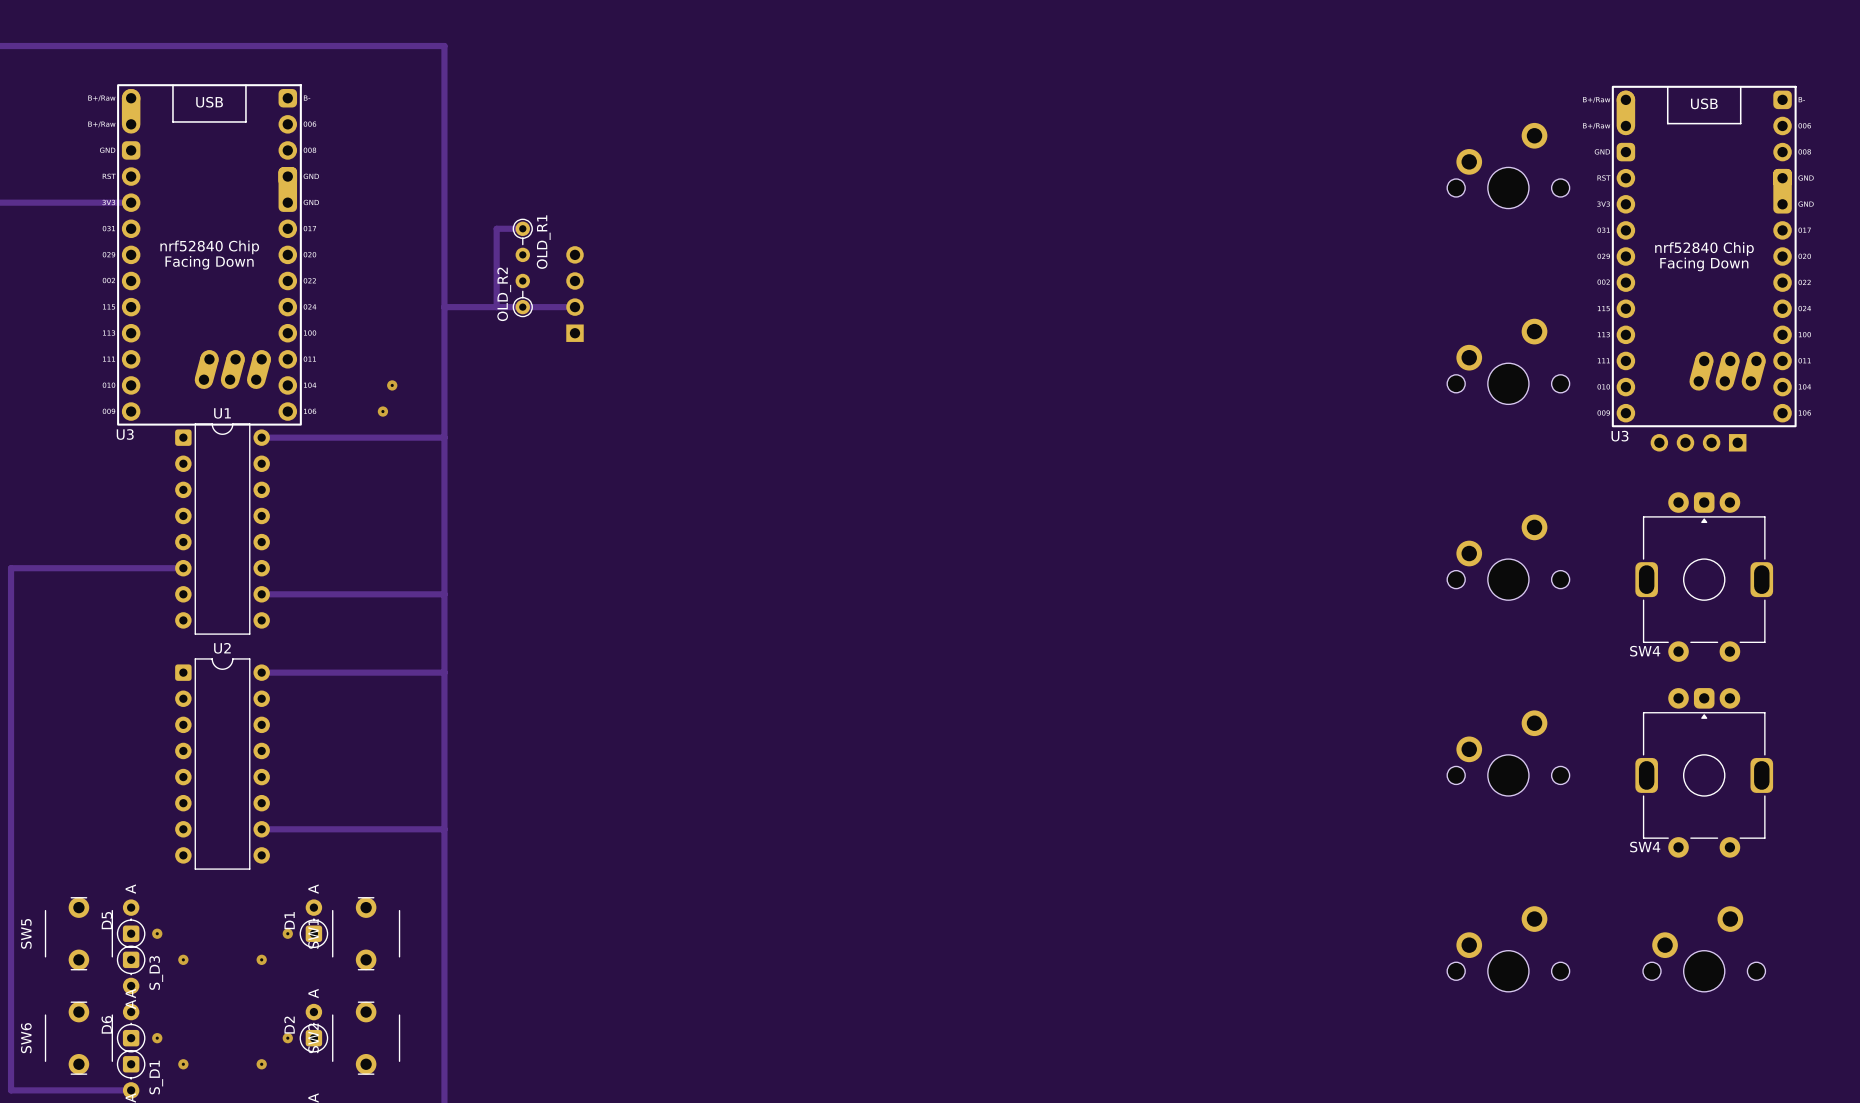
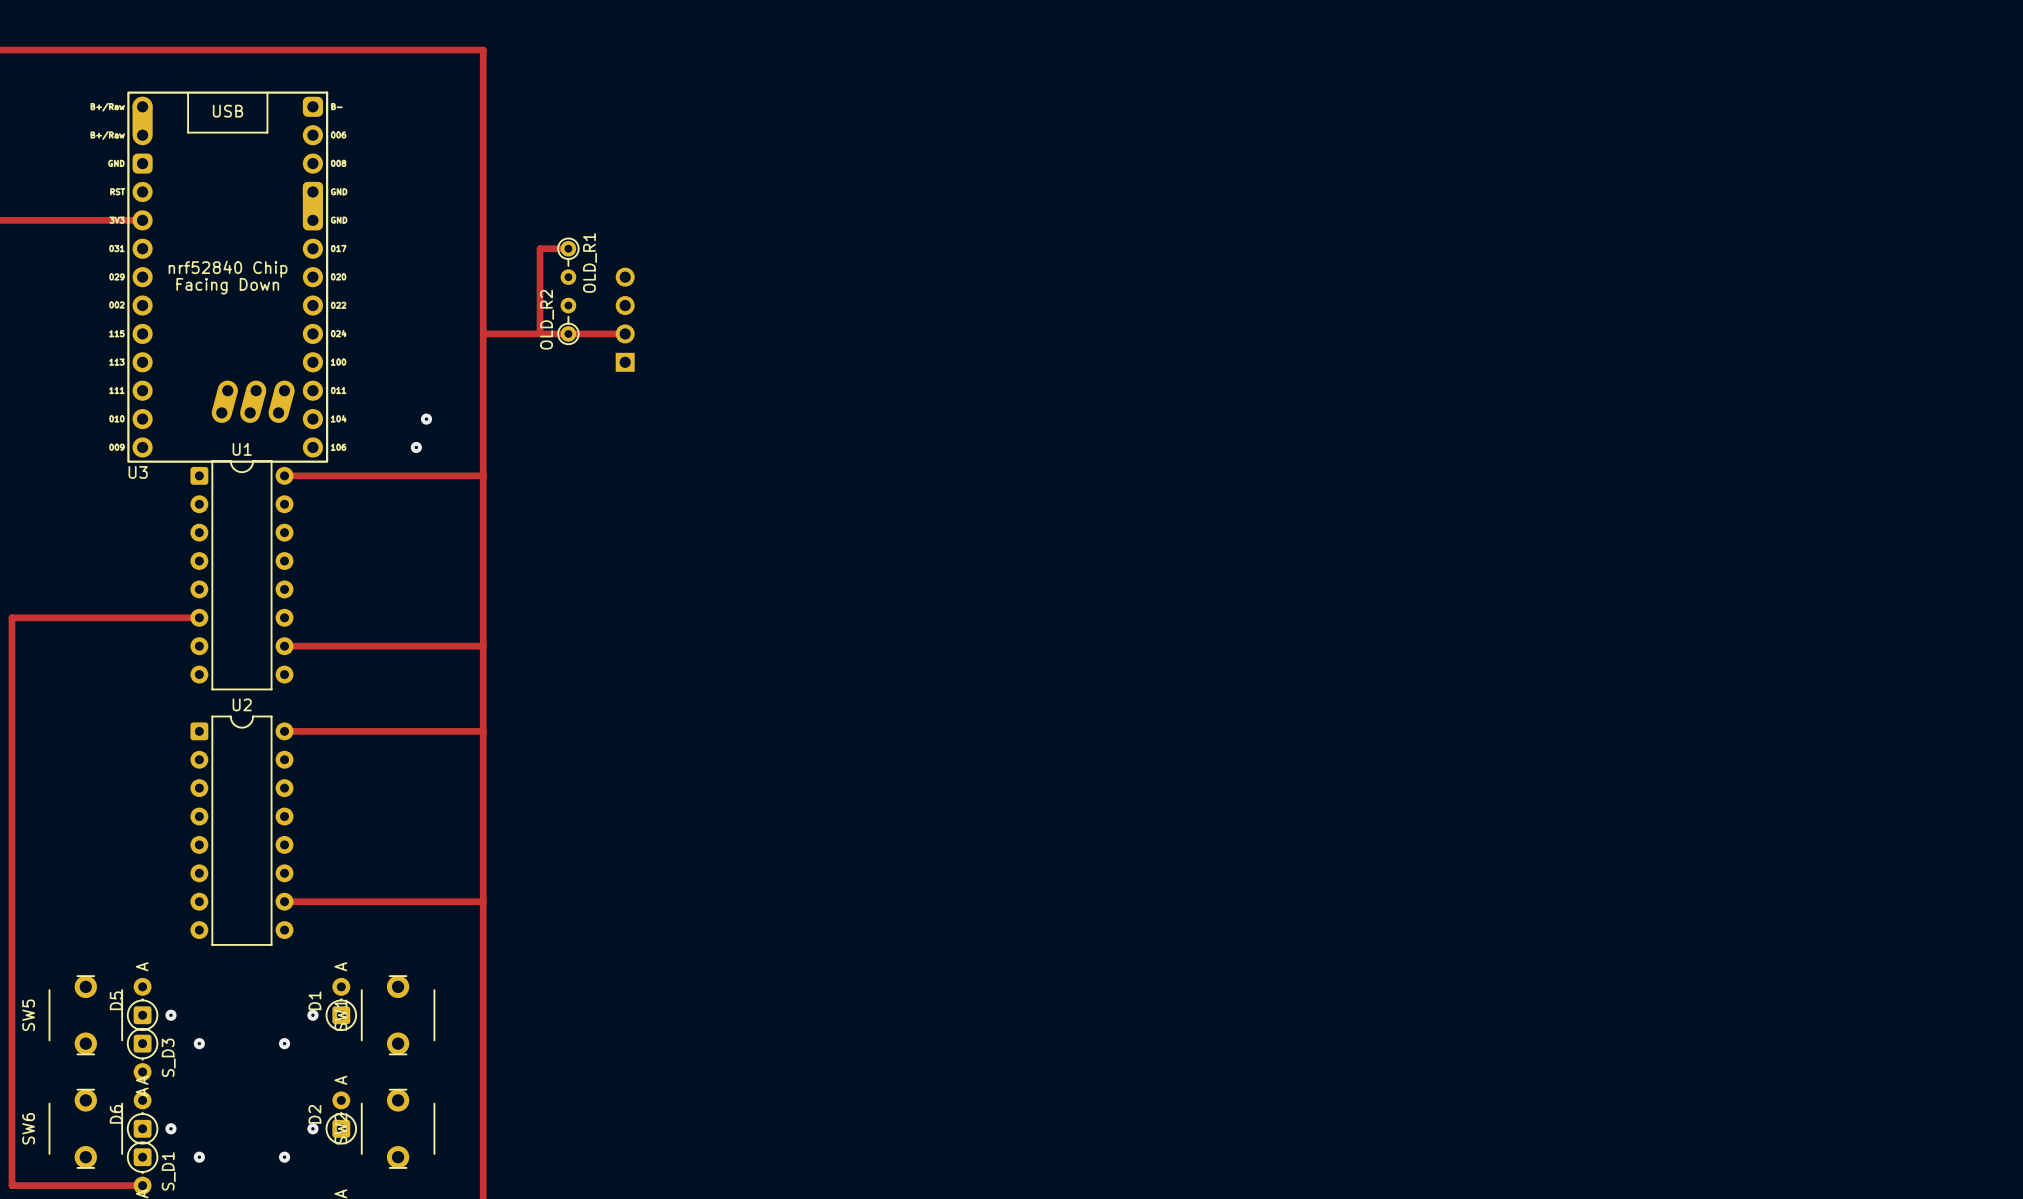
part: (1508, 165) -> none
U3: (1704, 256) -> none
part: (1508, 361) -> none
part: (1698, 442) -> none
part: (1508, 557) -> none
SW4: (1704, 577) -> none
part: (1508, 753) -> none
SW4: (1704, 772) -> none
part: (1508, 949) -> none
part: (1704, 949) -> none

